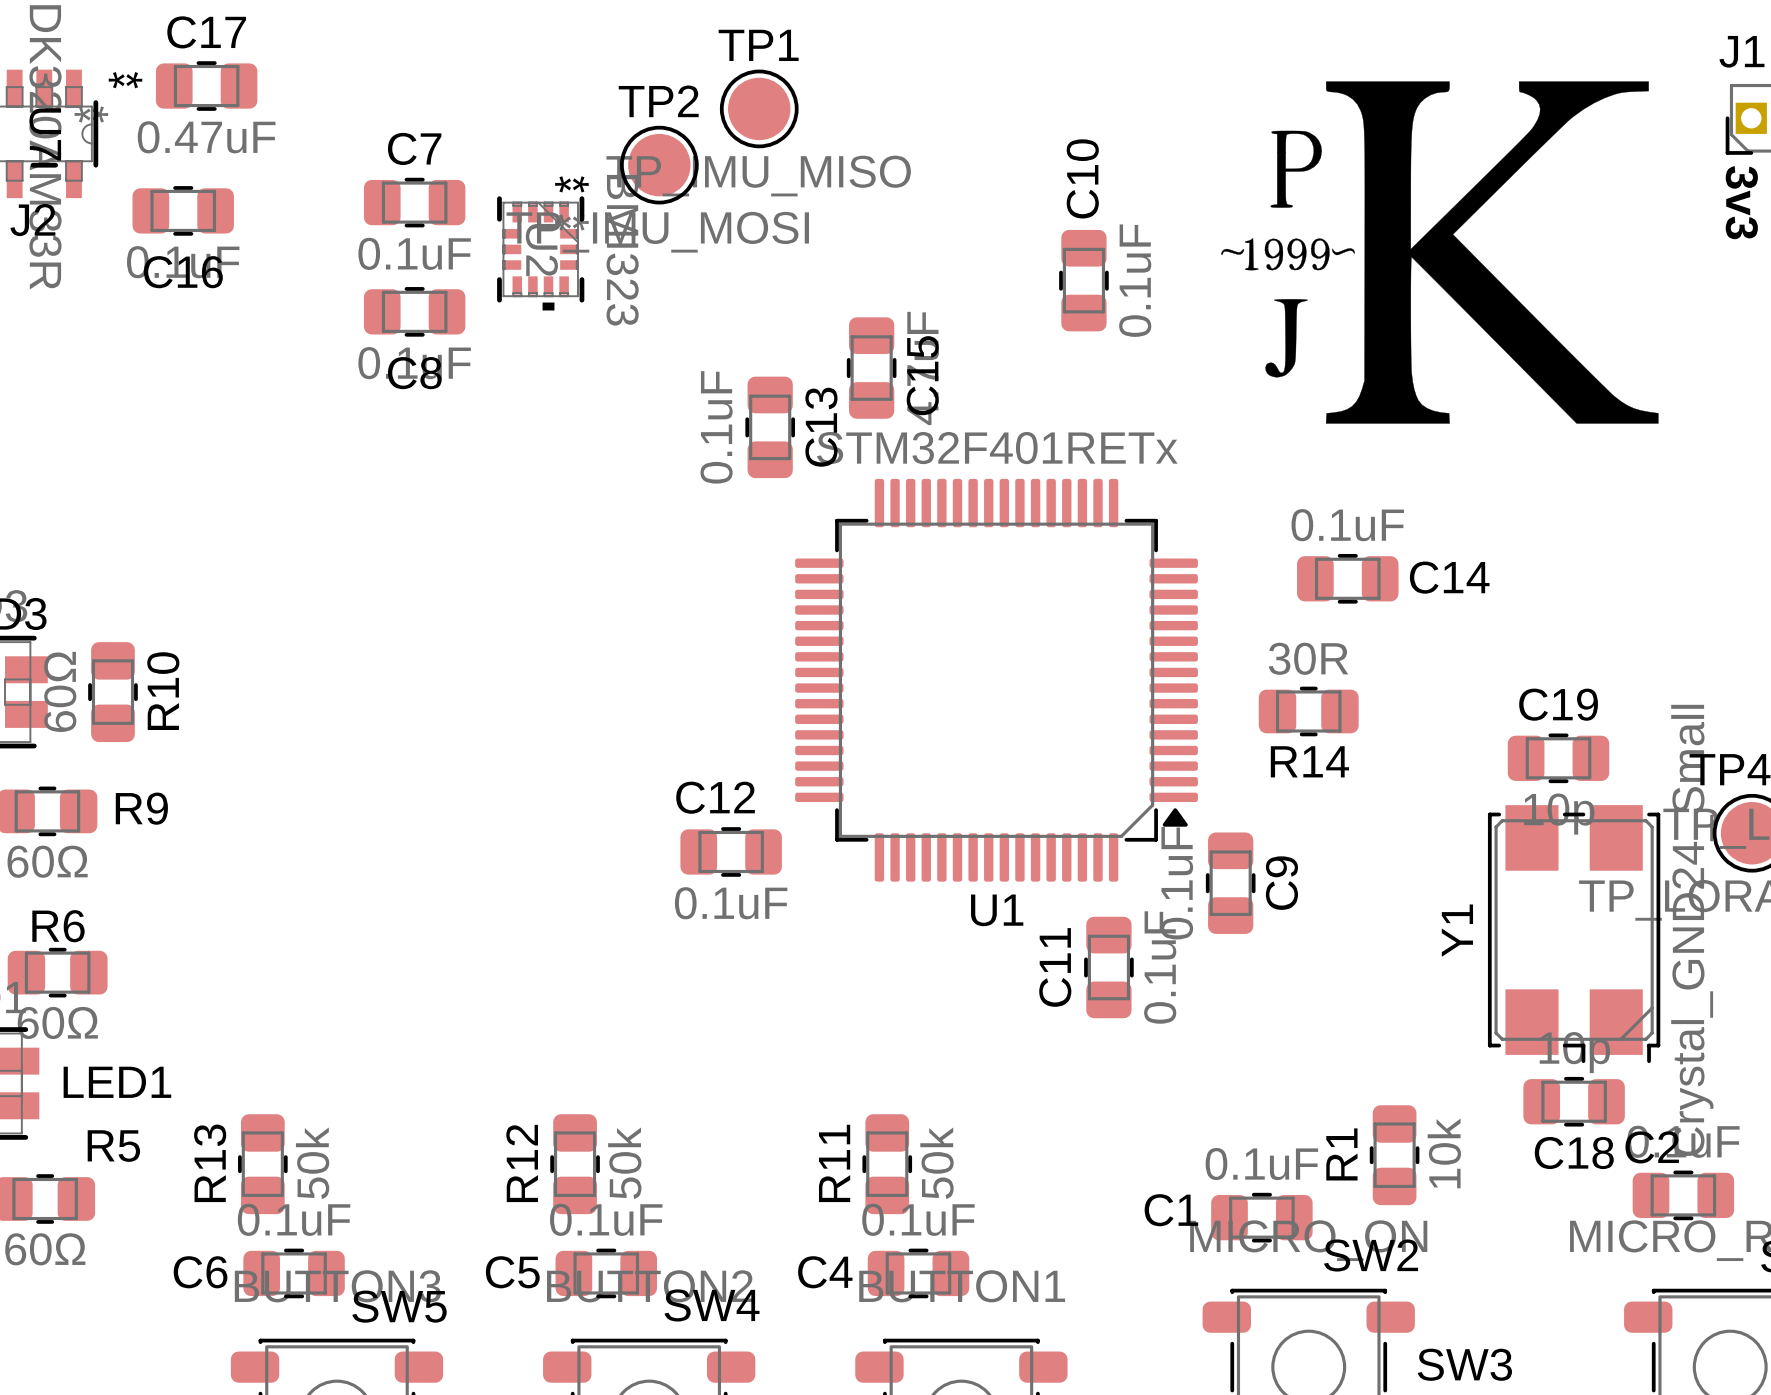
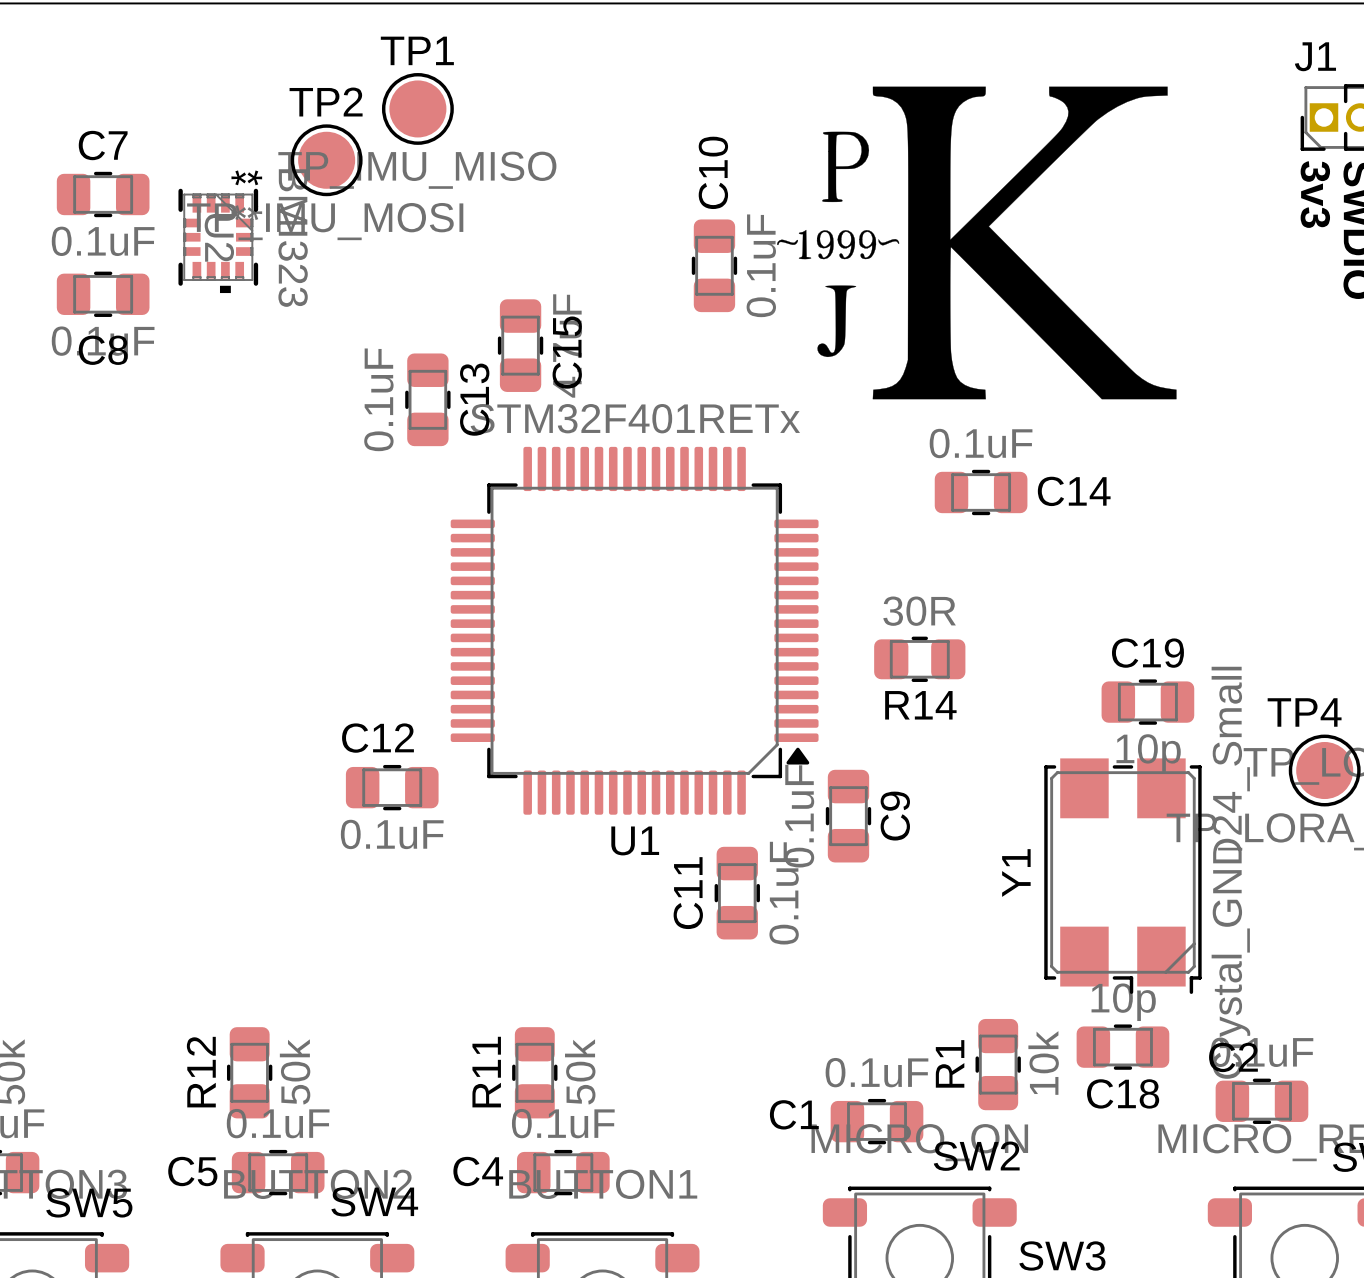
drawing position: (1439, 252) -> (976, 242)
C14 position: (1347, 578) -> (981, 492)
Y1 position: (1574, 934) -> (1122, 876)
C18 position: (1574, 1101) -> (1122, 1047)

